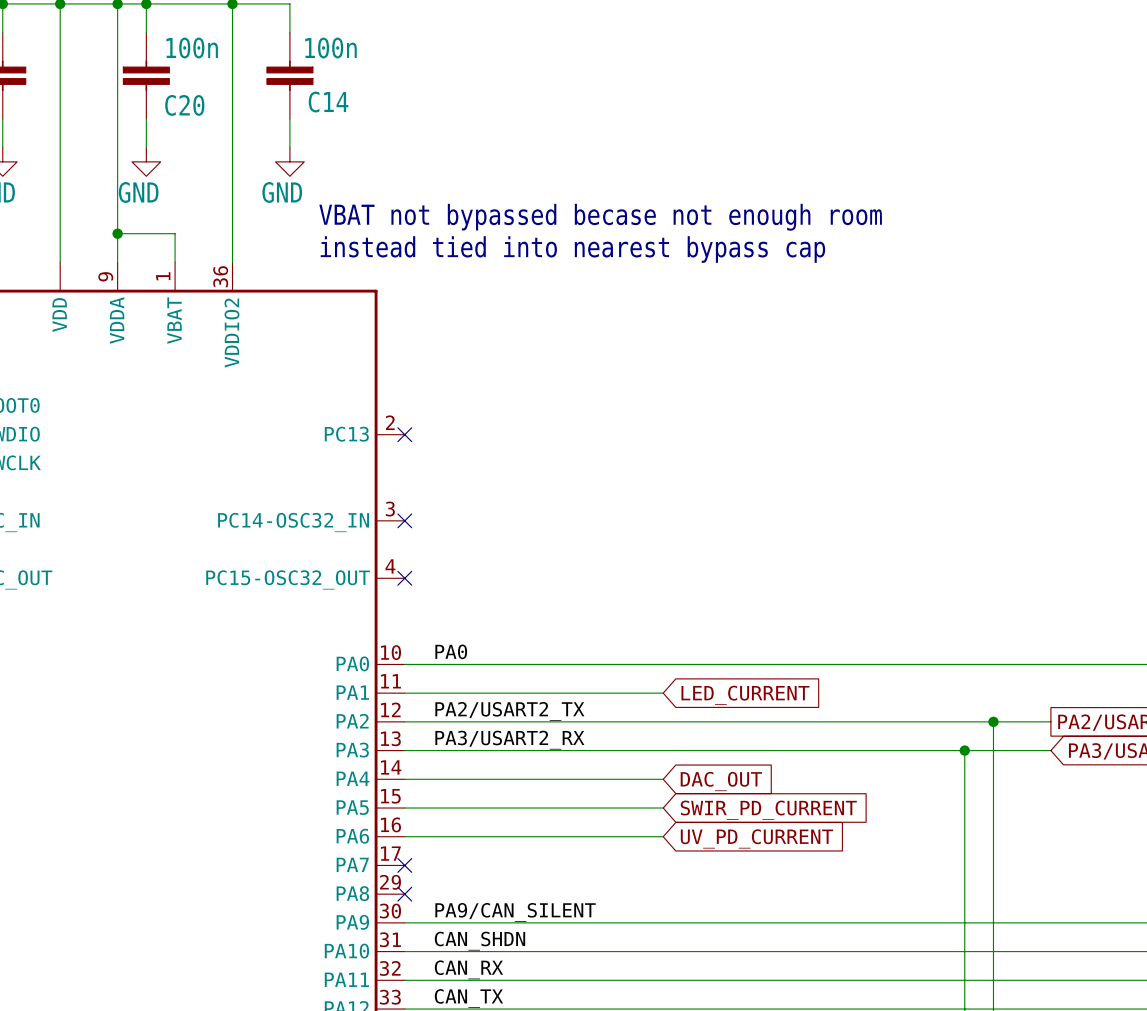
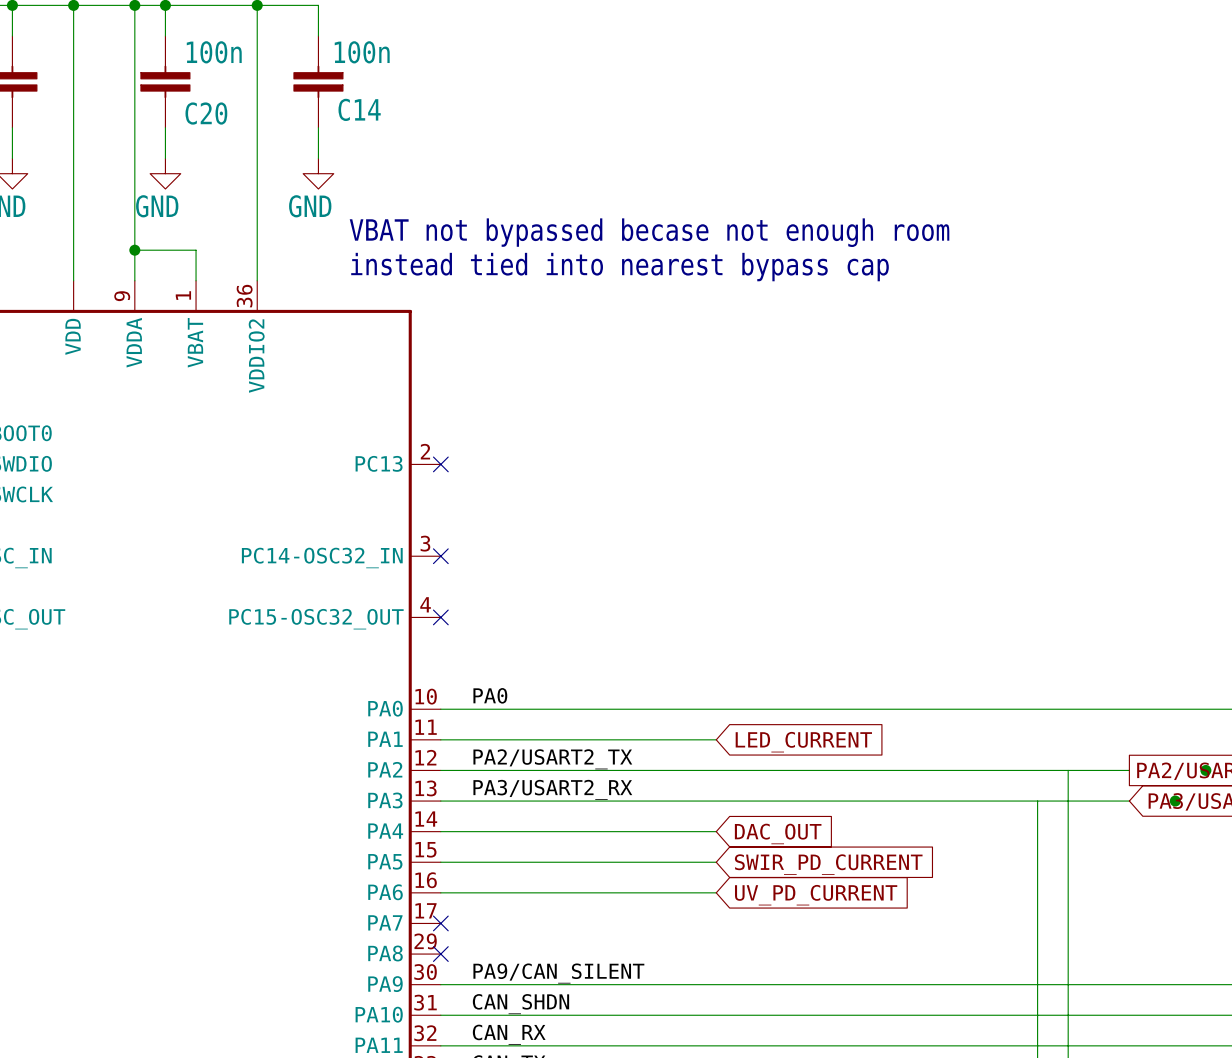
junction: (993, 721) -> none
junction: none -> (1205, 770)
junction: (964, 750) -> none
junction: none -> (1175, 801)

